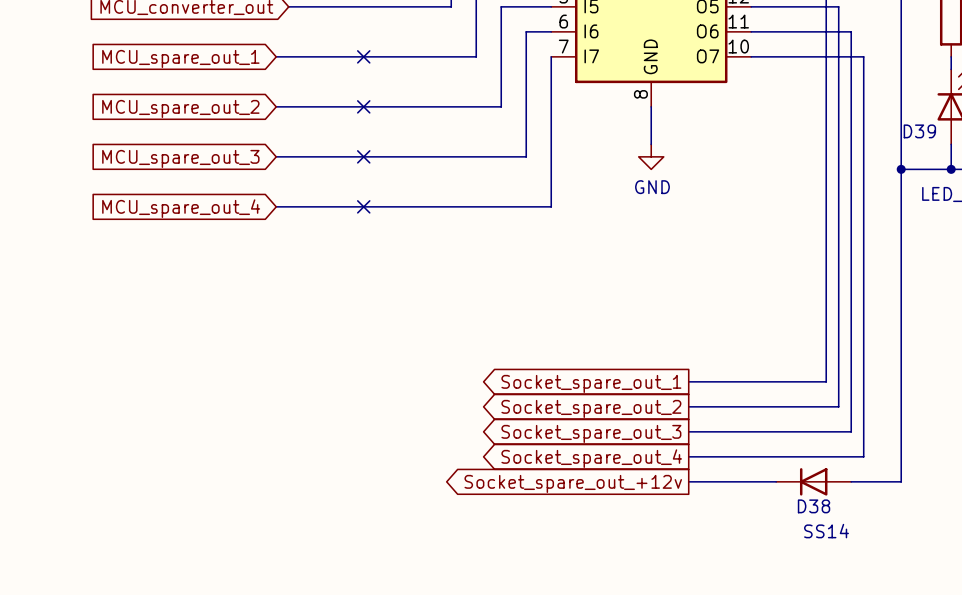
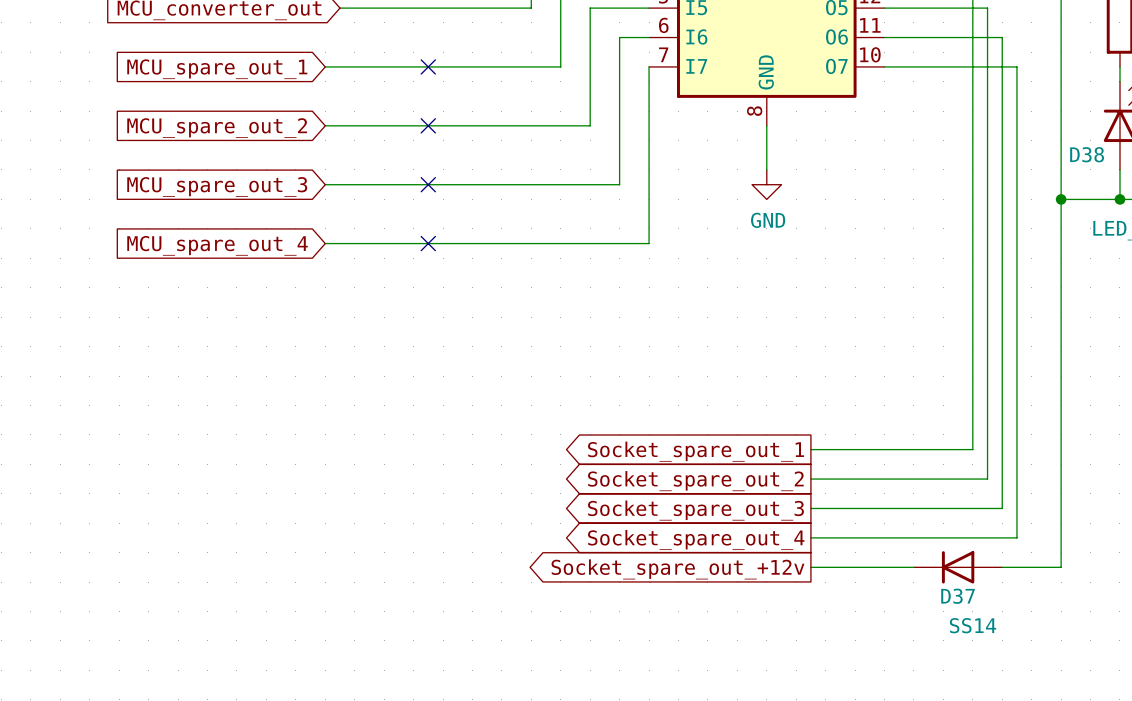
D39 name: D39 (919, 131) -> D38 (1087, 154)
D38 name: D38 (814, 506) -> D37 (958, 596)

